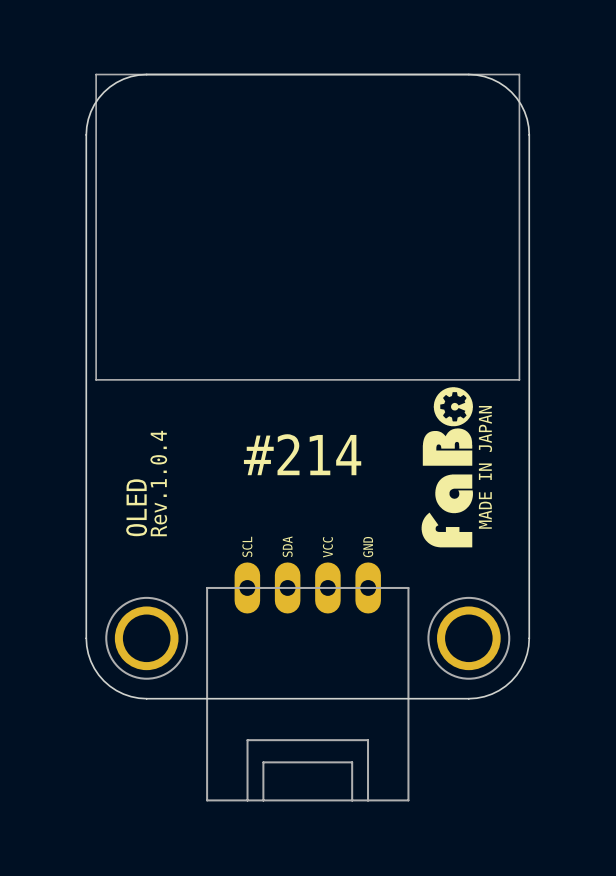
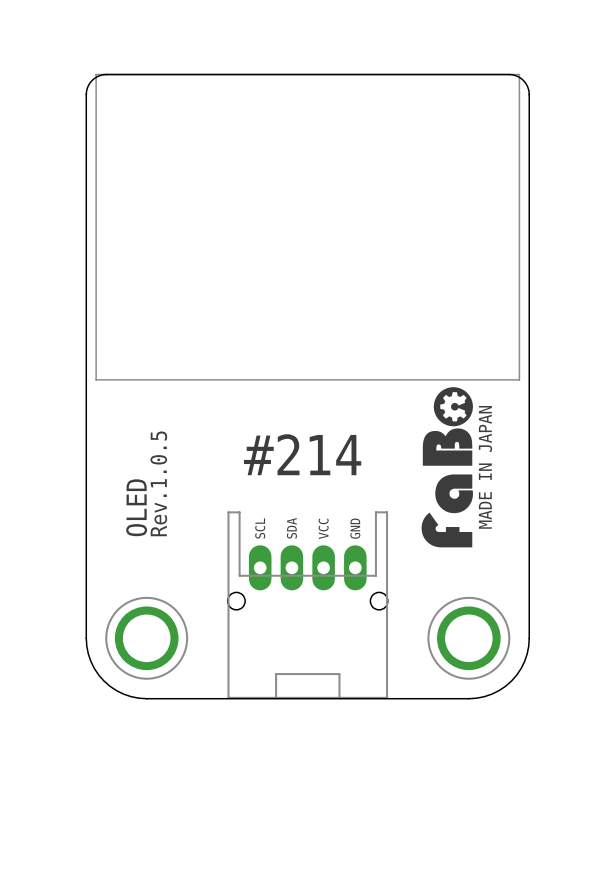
part: none -> (307, 386)
part: (307, 437) -> none
text: Rev.1.0.4 (158, 483) -> Rev.1.0.5 (158, 483)

